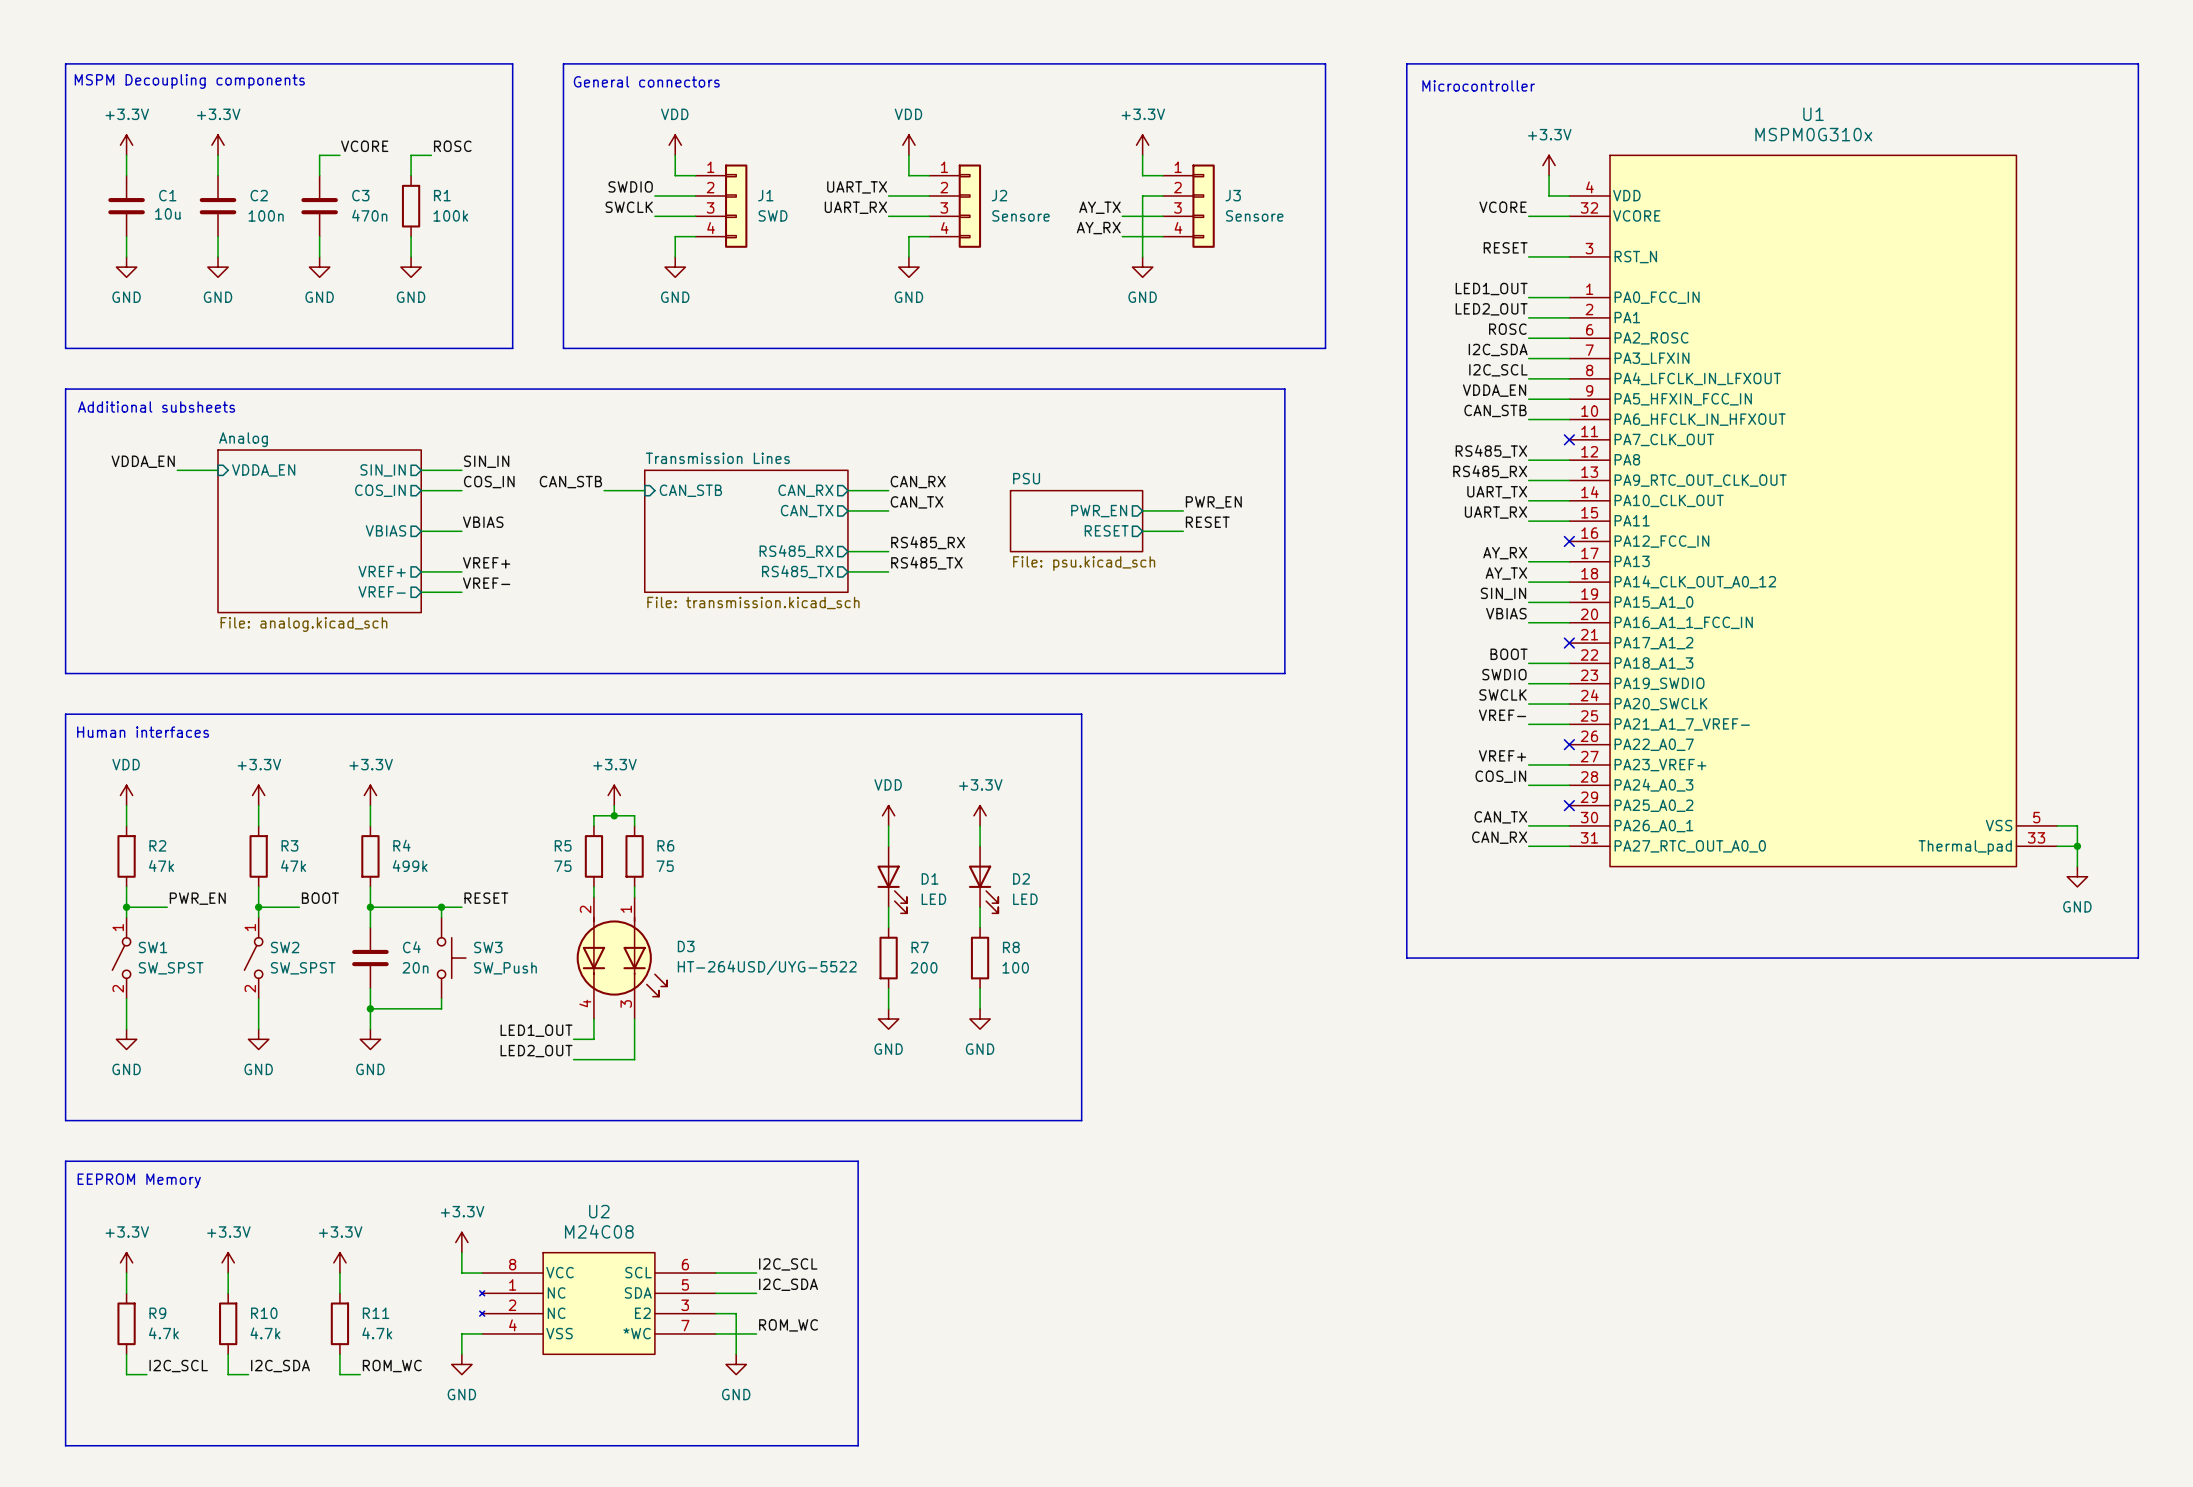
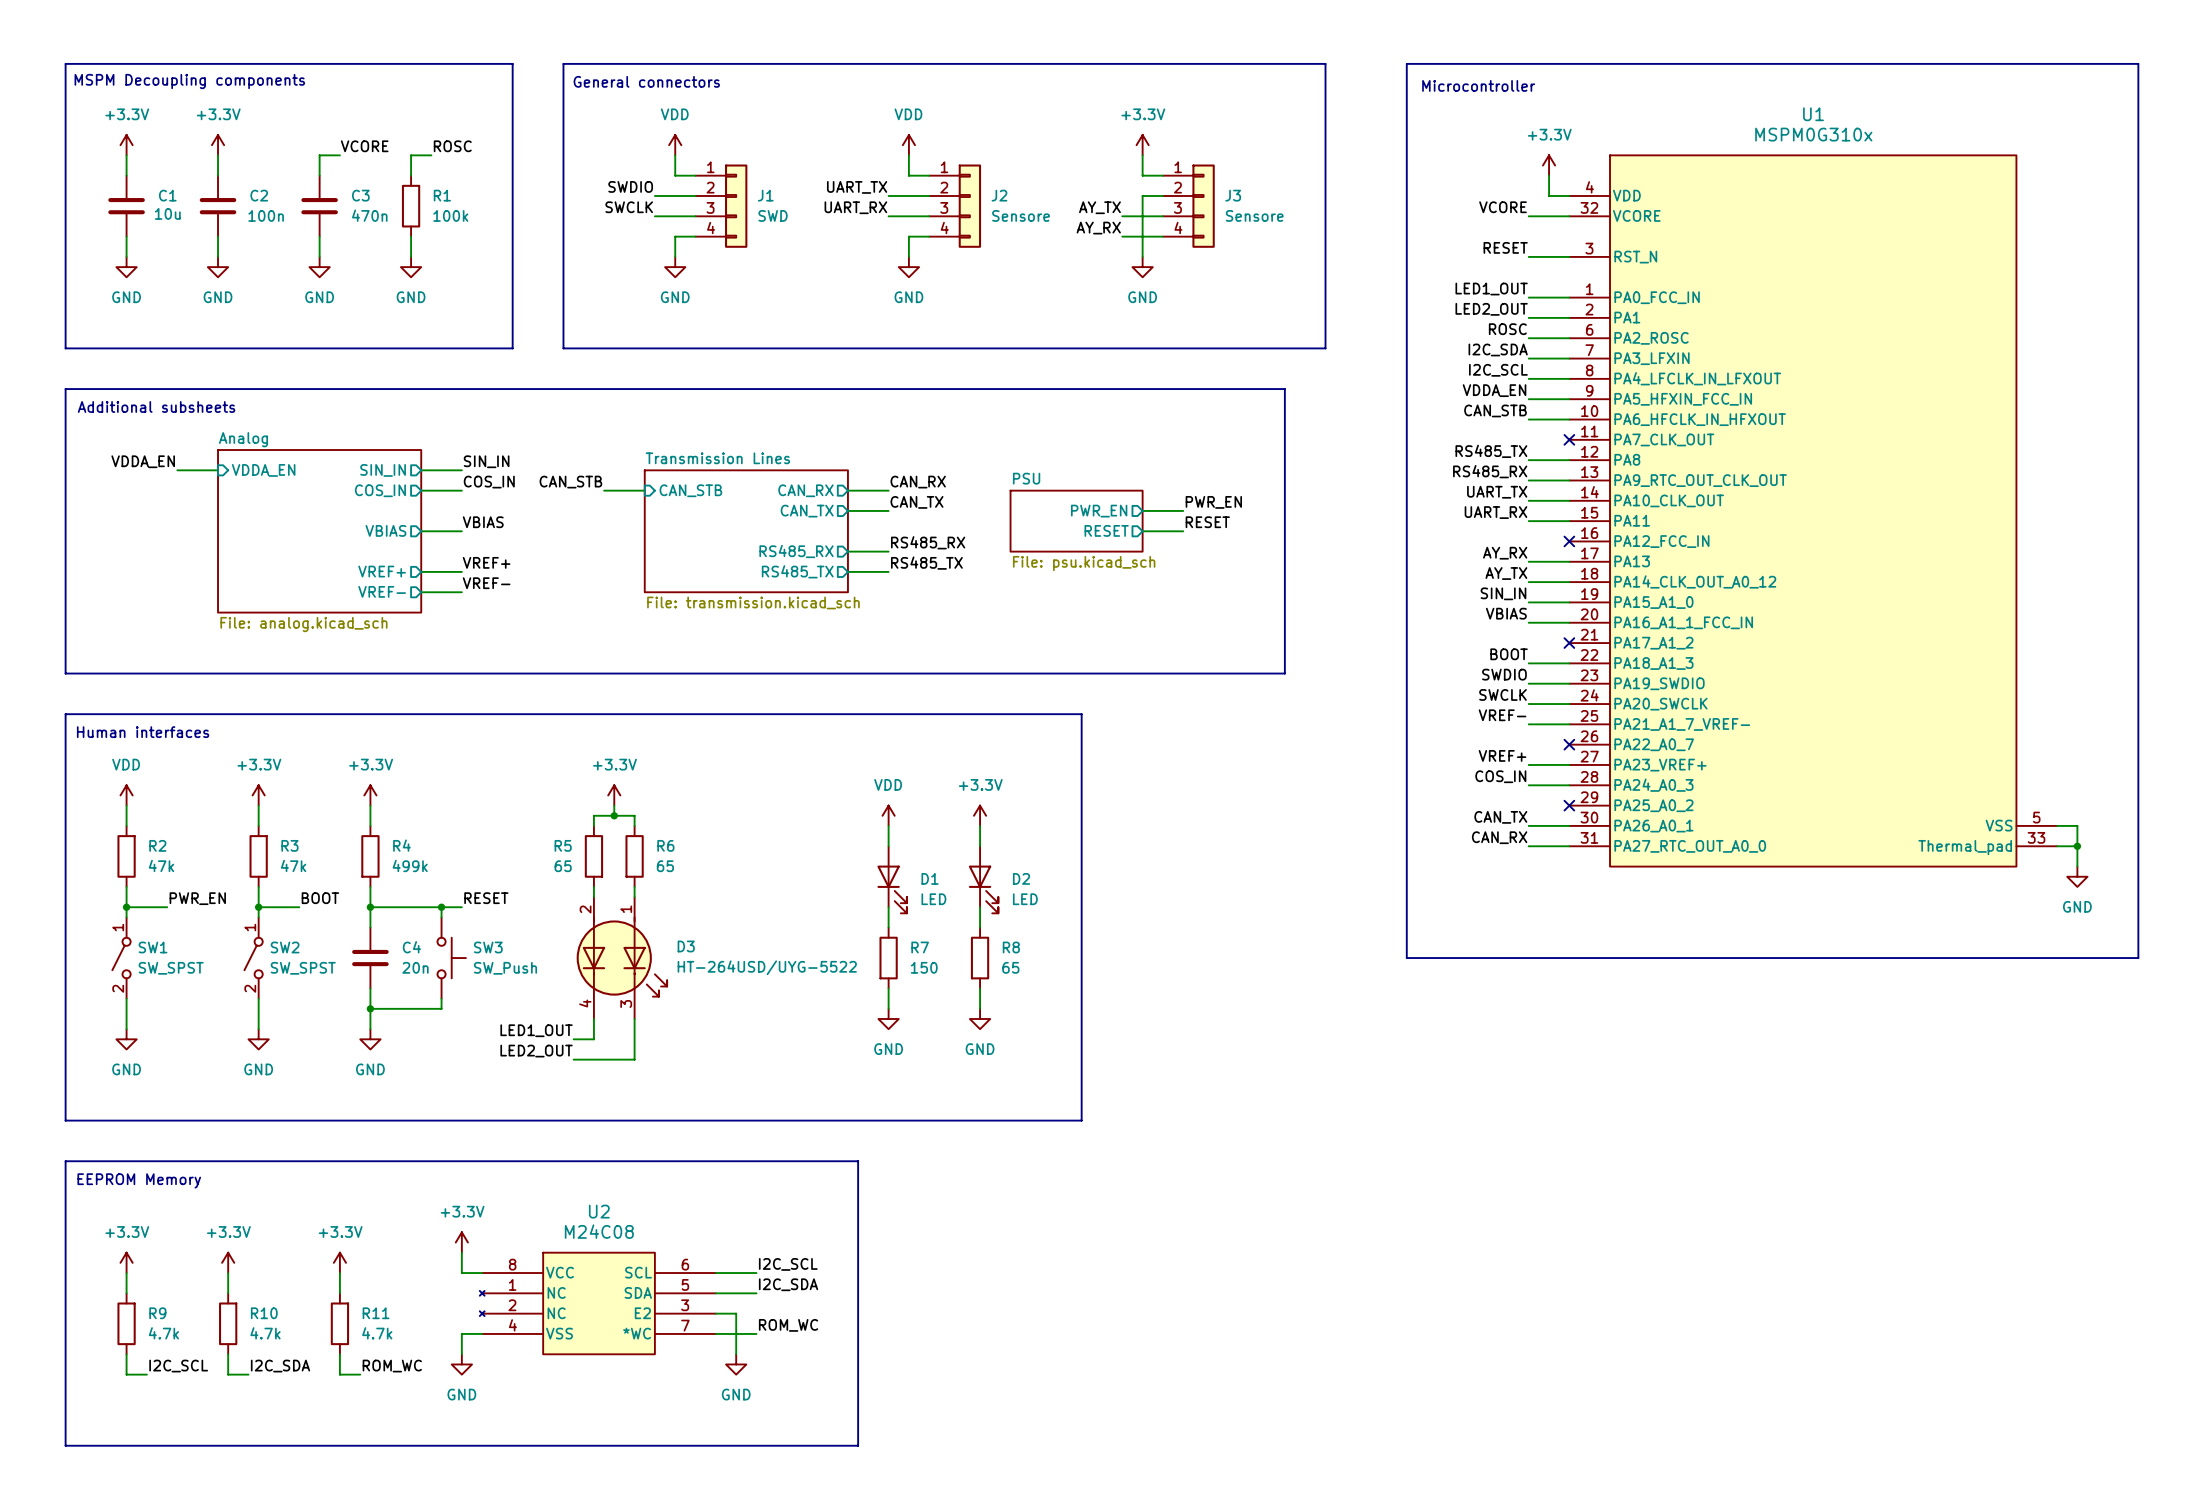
R5 value: 75 (562, 866) -> 65 (563, 866)
R6 value: 75 (665, 866) -> 65 (665, 866)
R7 value: 200 (924, 967) -> 150 (924, 967)
R8 value: 100 (1015, 967) -> 65 (1010, 967)

